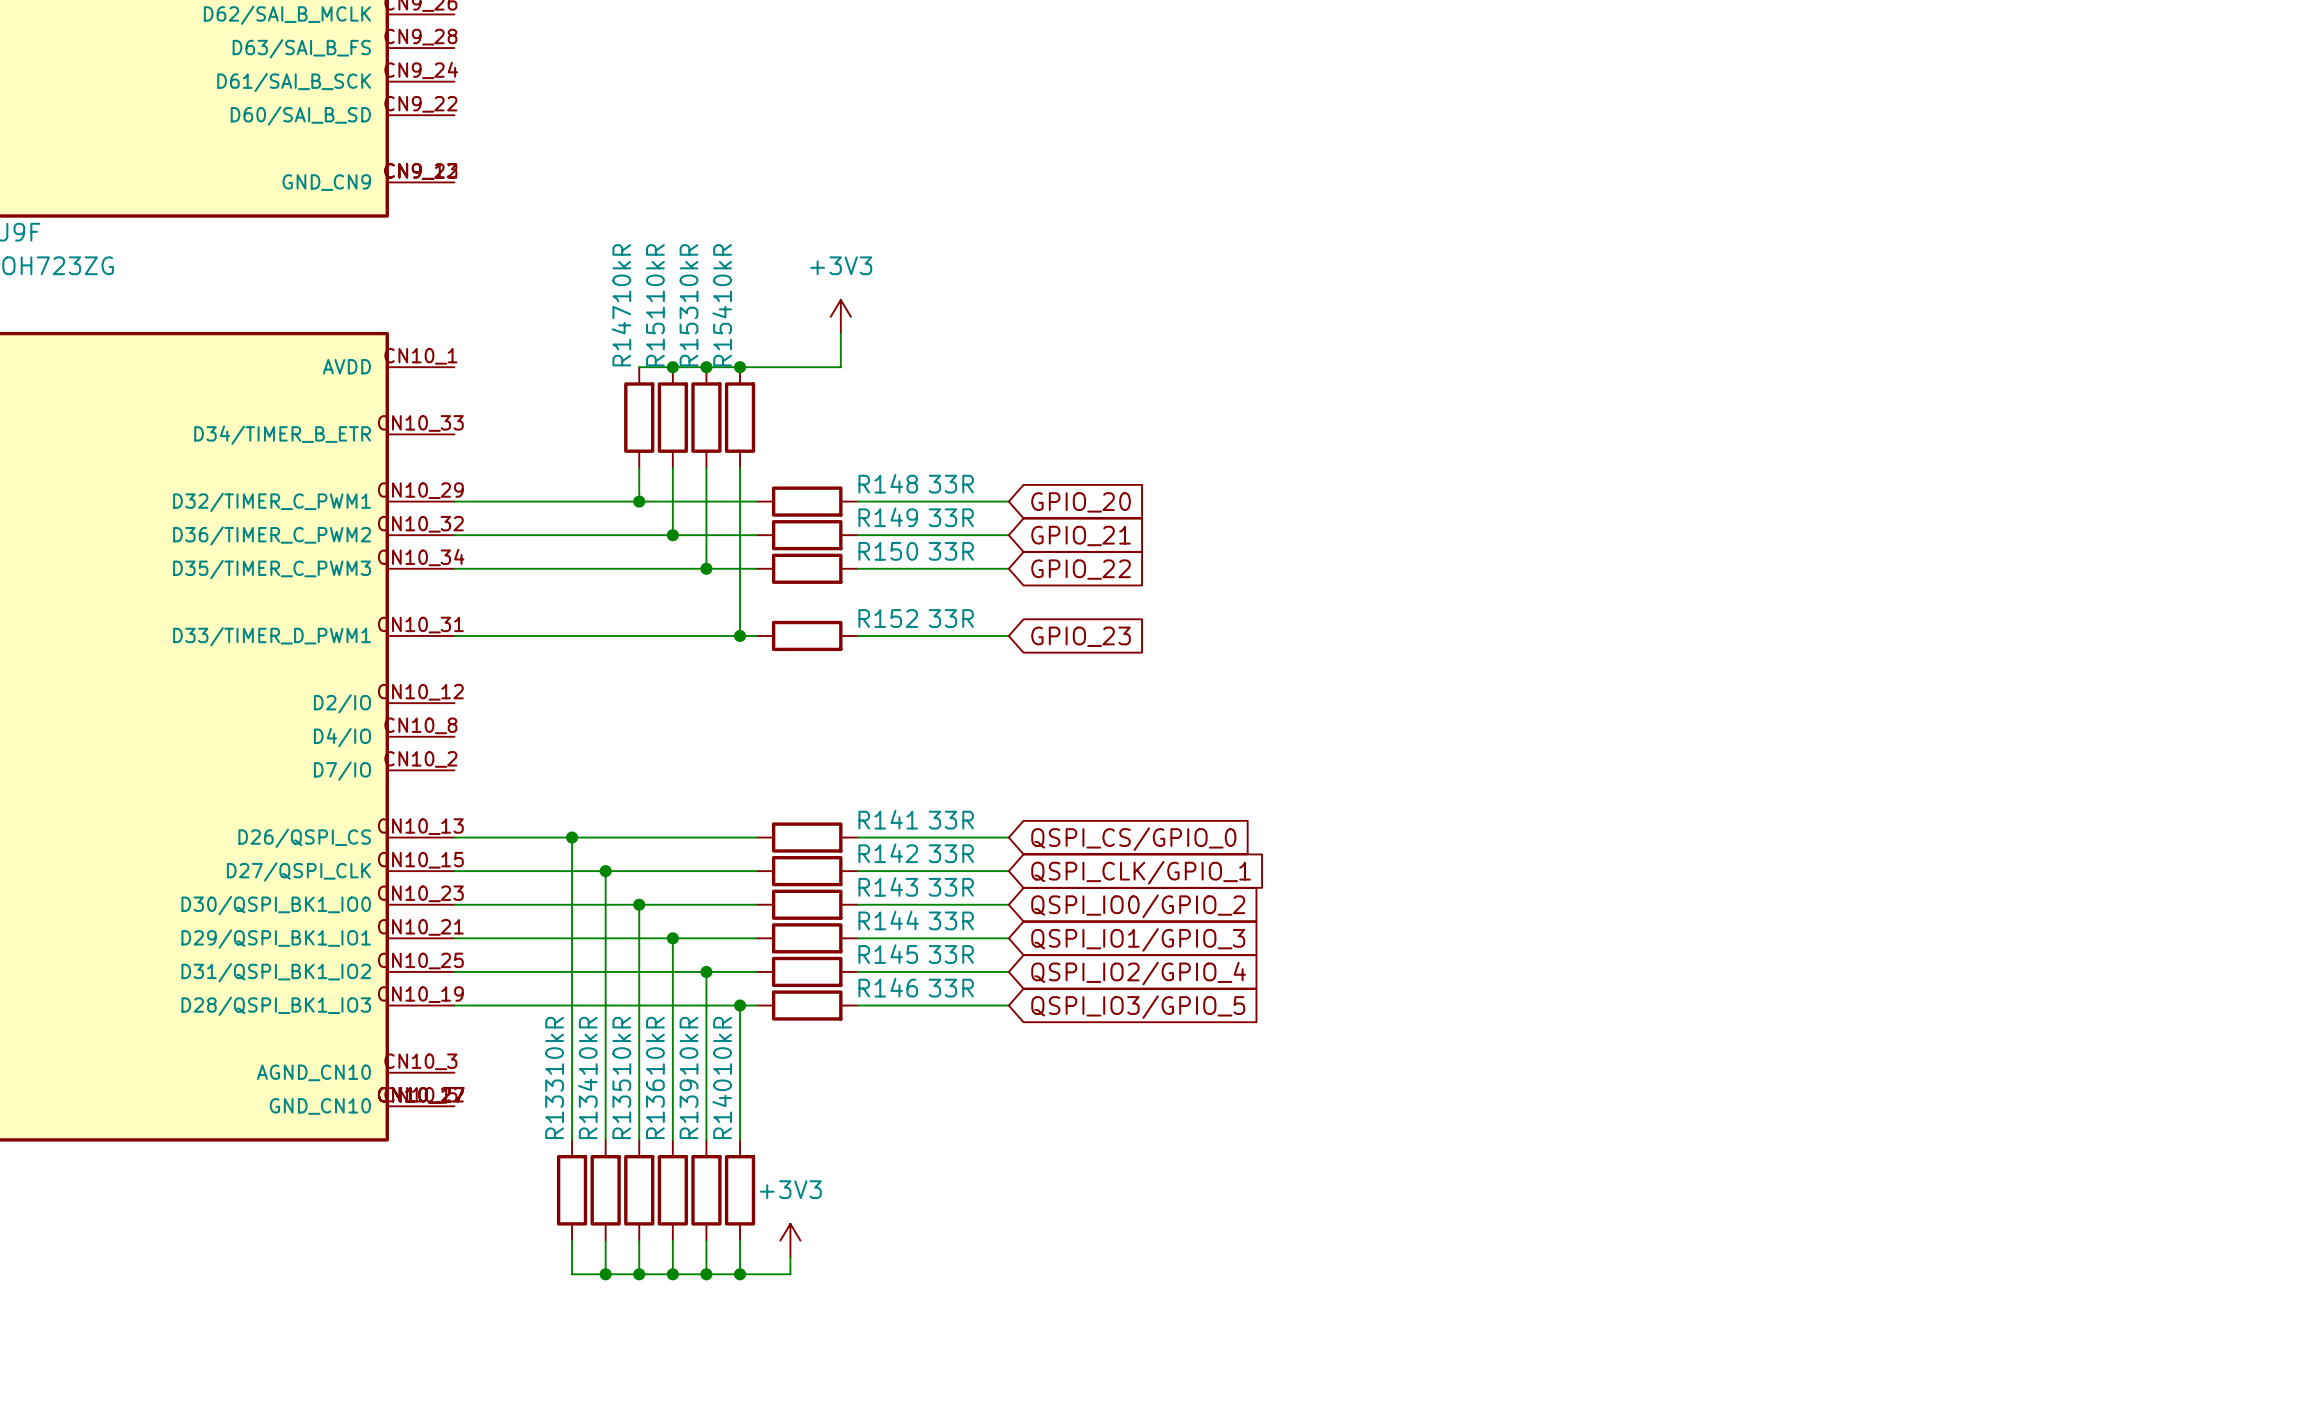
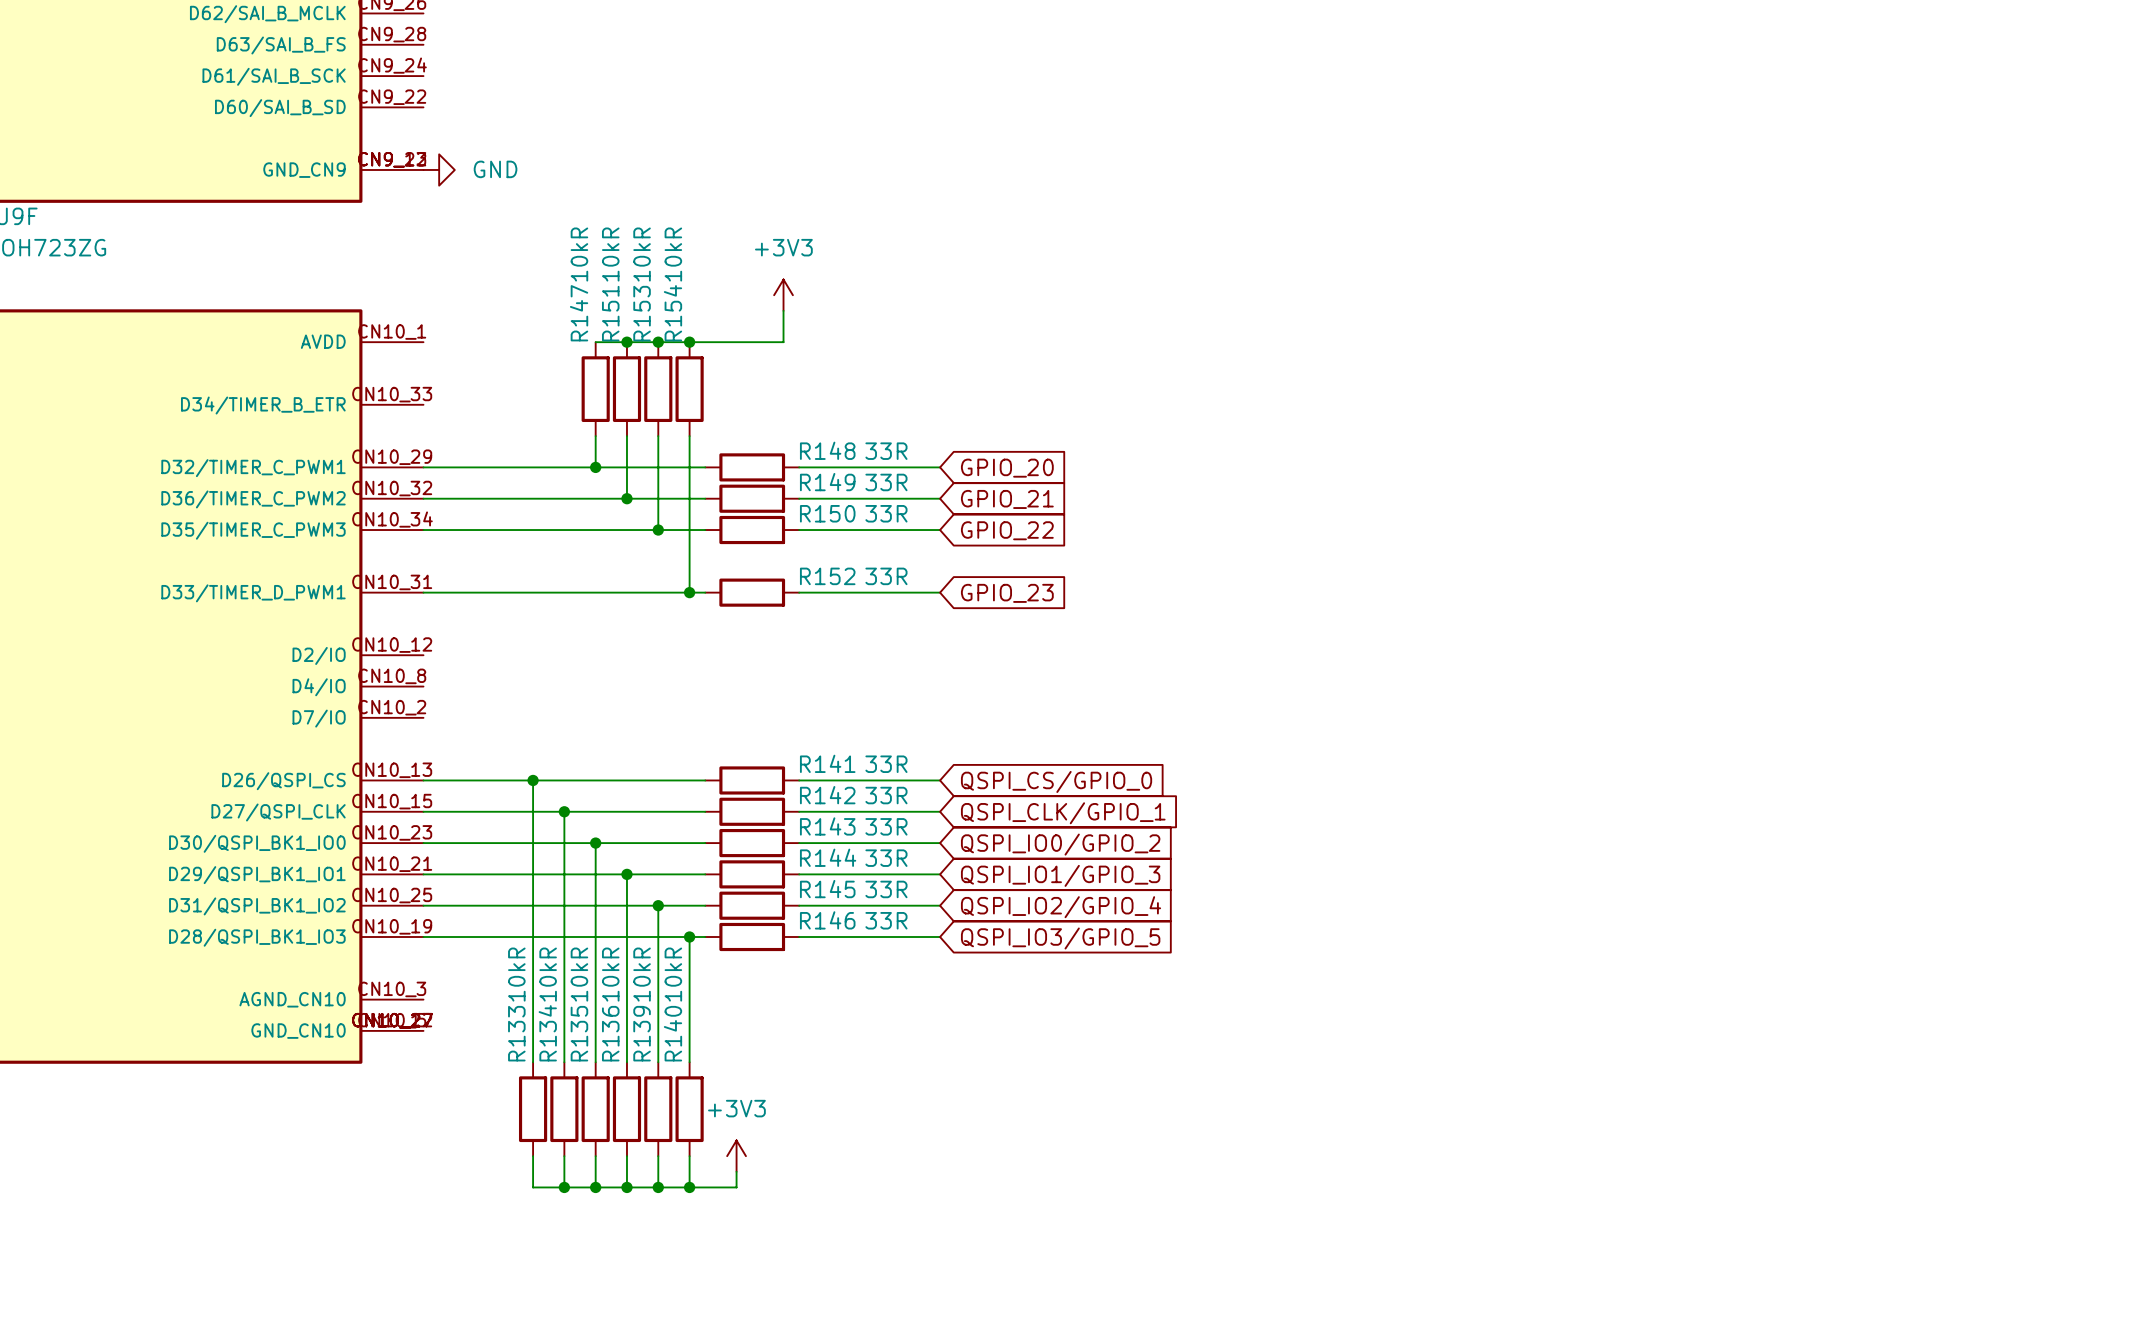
power symbol: none -> GND (439, 169)

